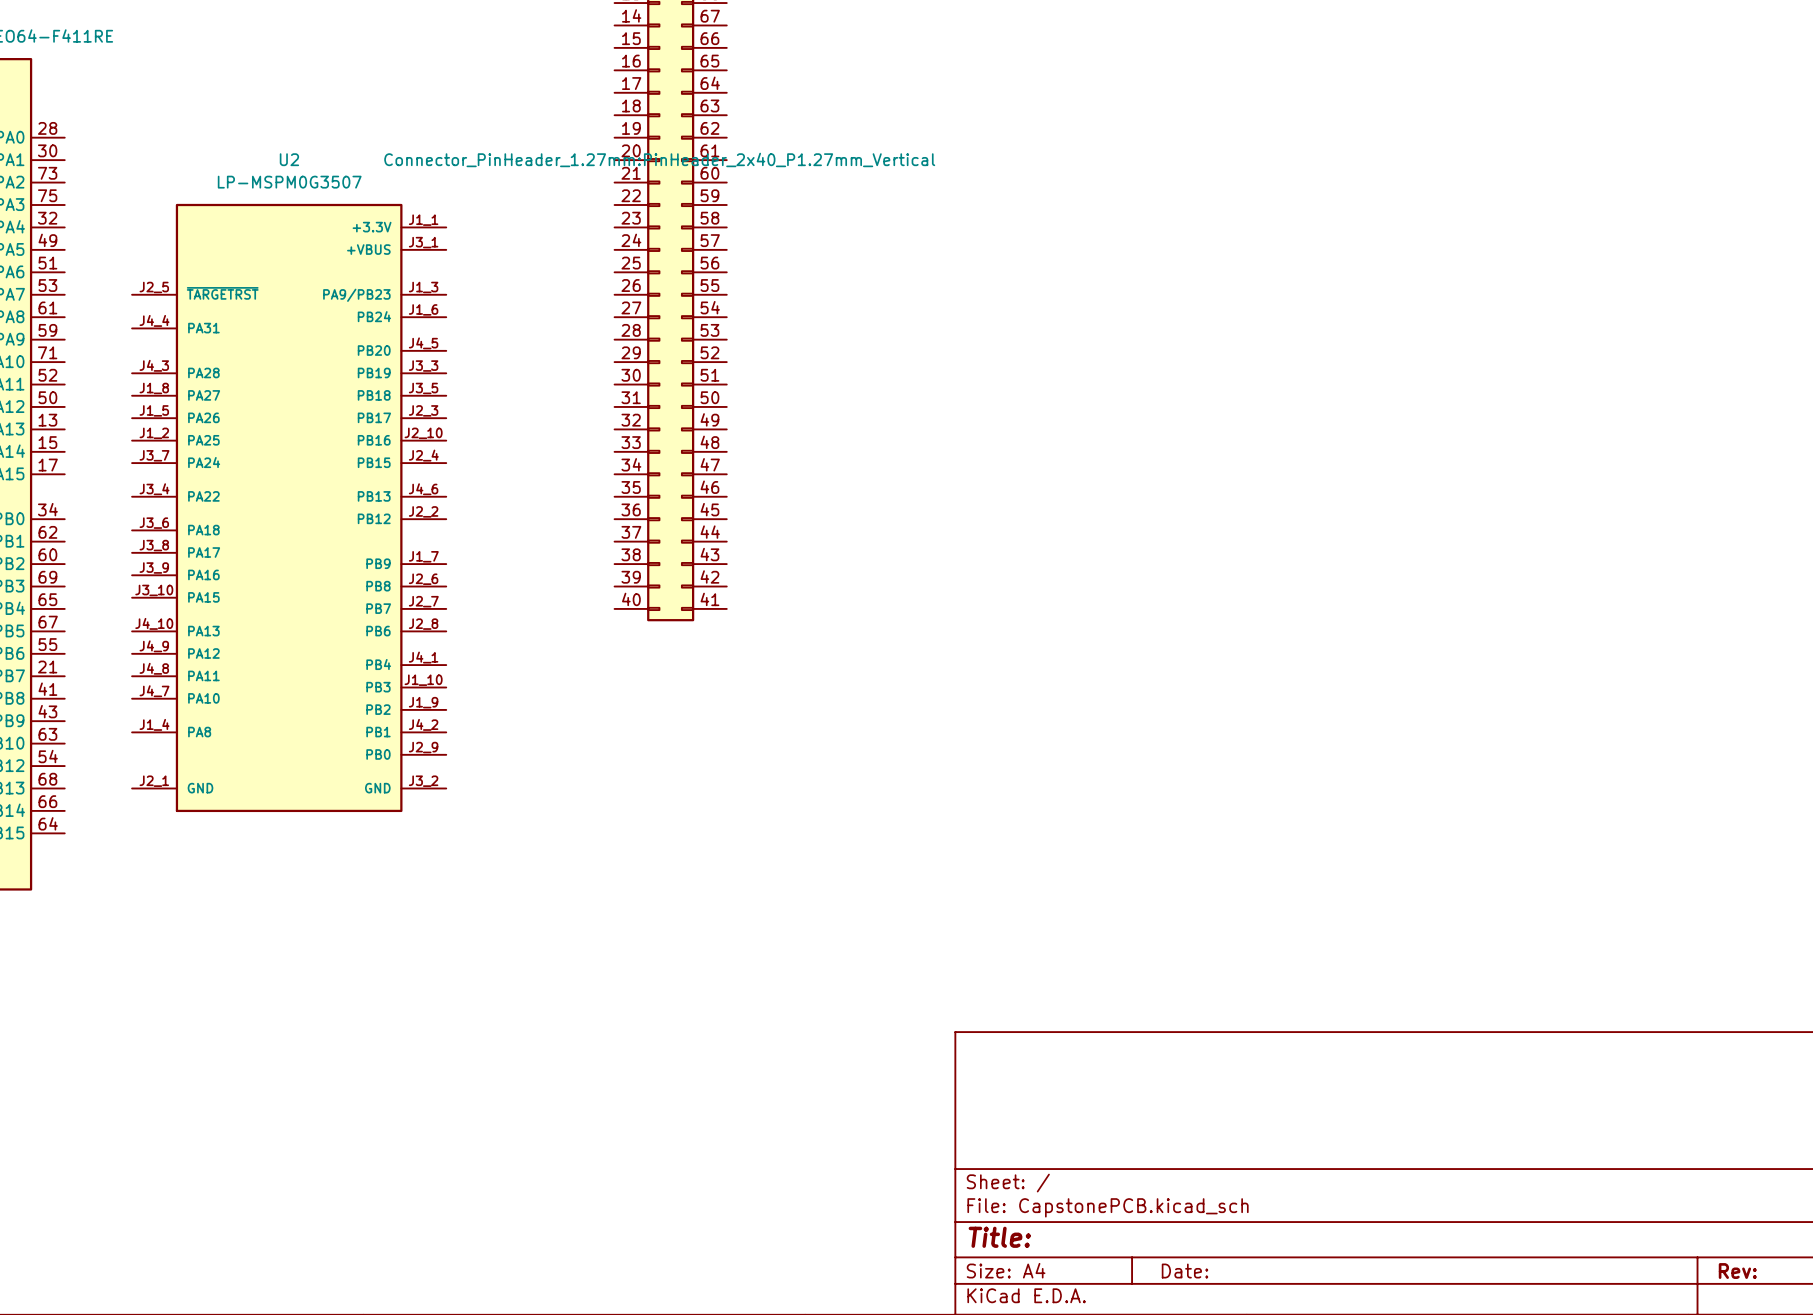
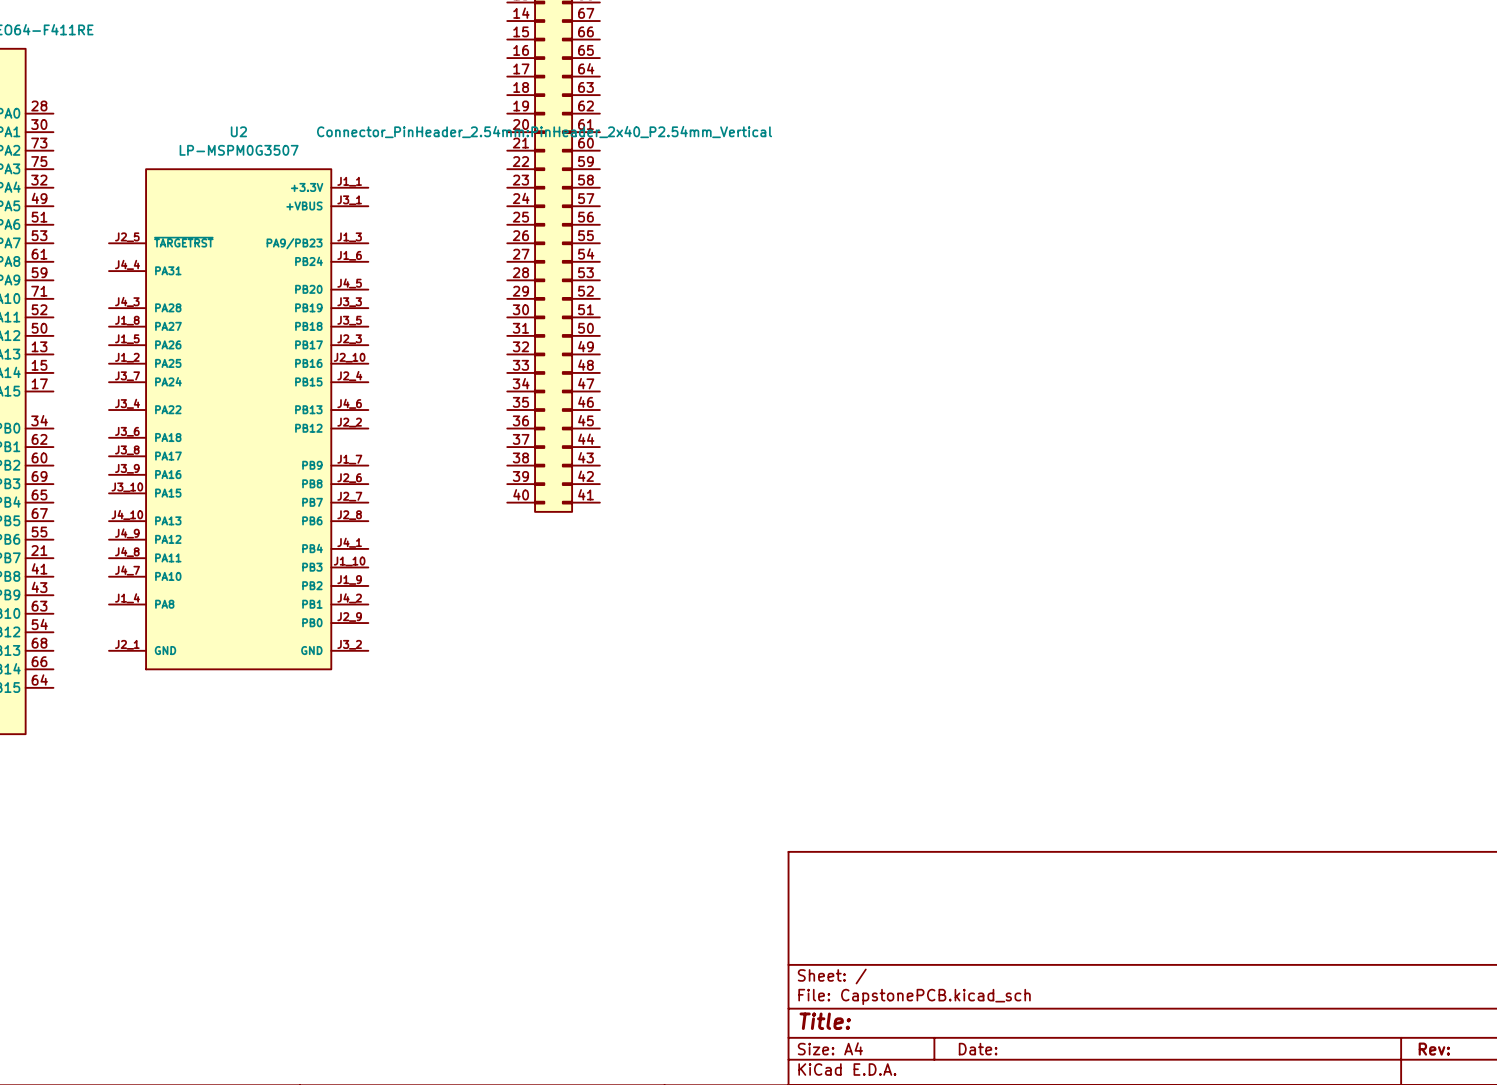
part text: Connector_PinHeader_1.27mm:PinHeader_2x40_P1.27mm_Vertical (659, 159) -> Connector_PinHeader_2.54mm:PinHeader_2x40_P2.54mm_Vertical (544, 132)

